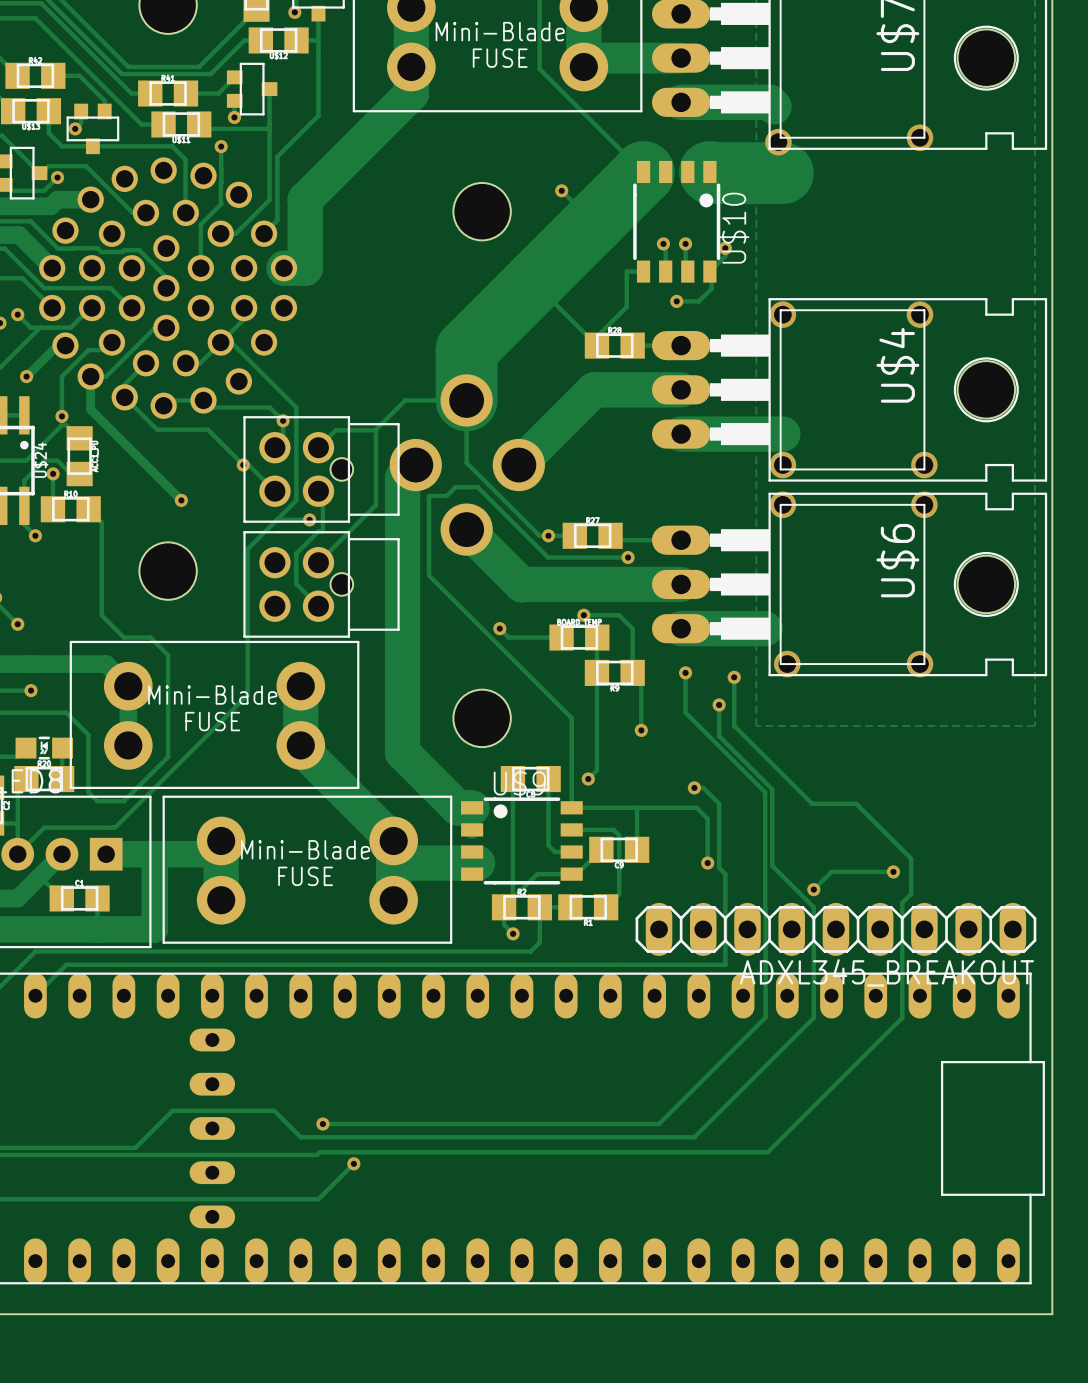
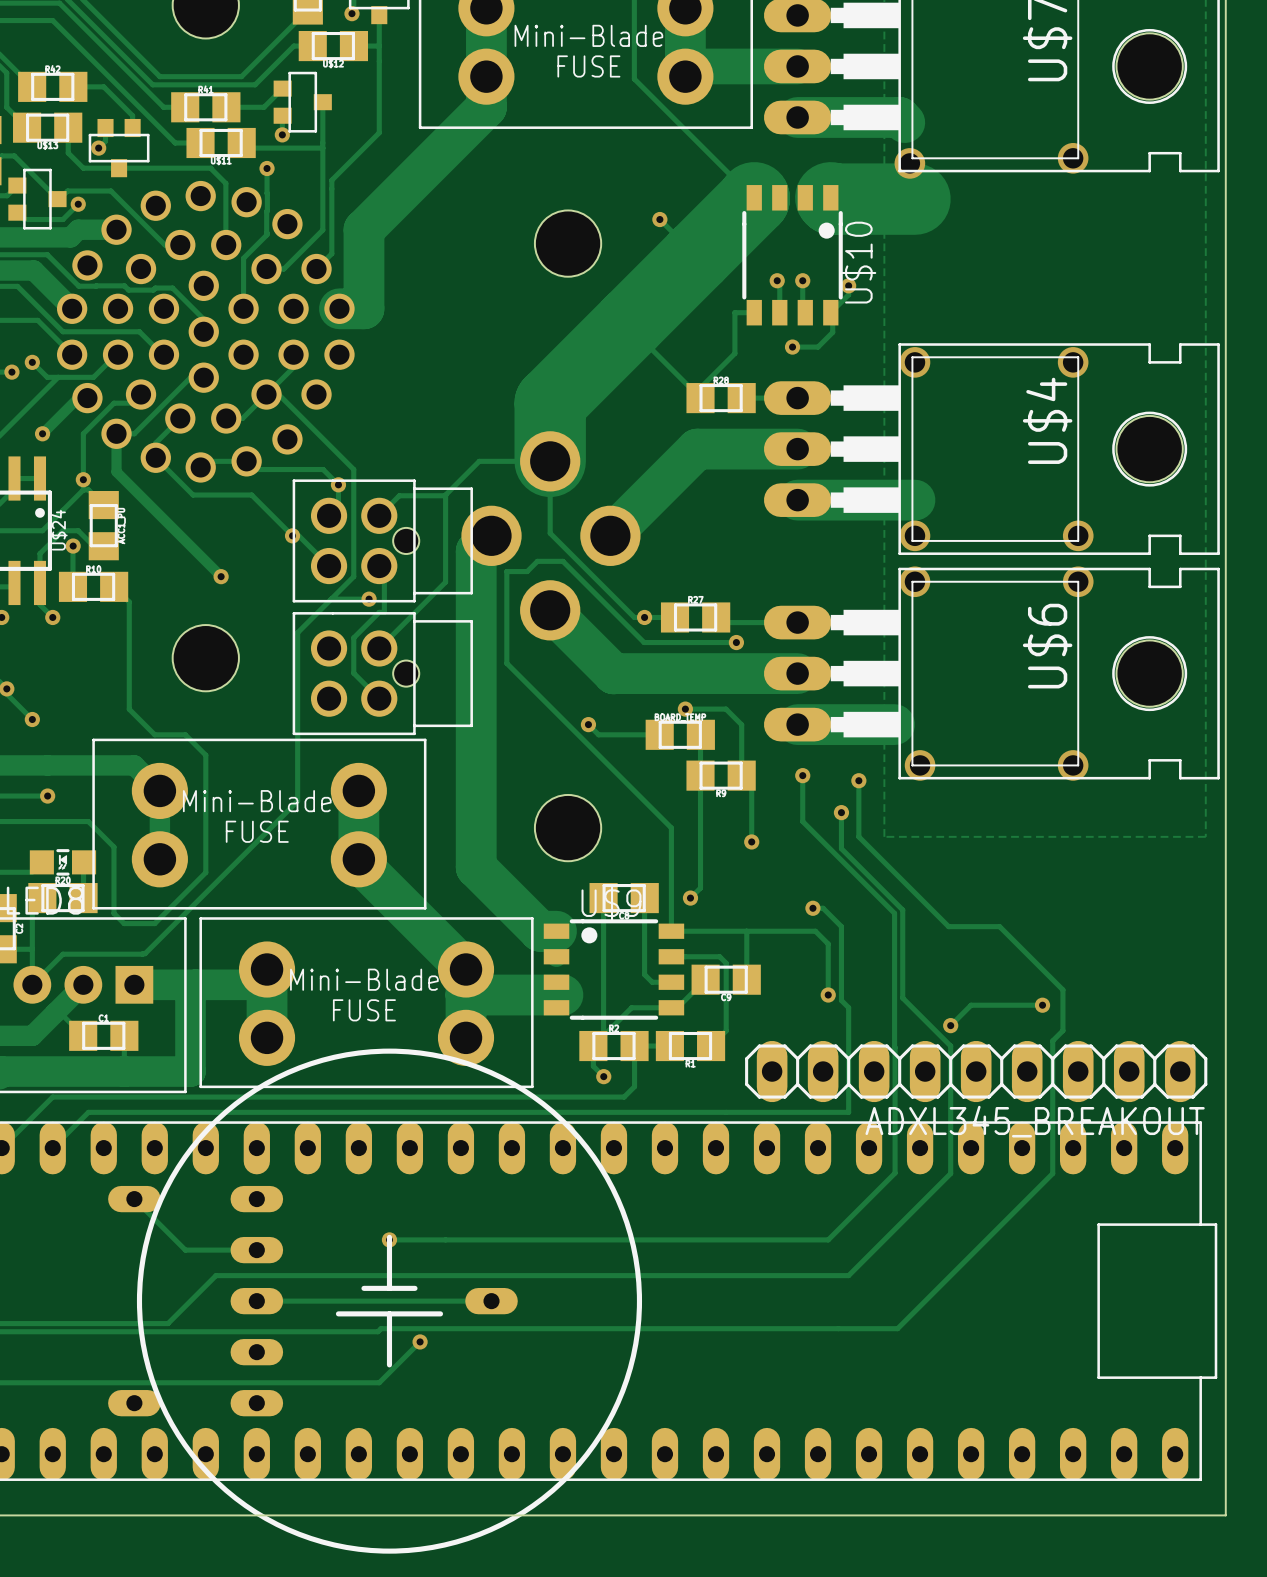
track: none -> (134, 1199) (185, 1250) (256, 1250)
track: (707, 1075) (659, 1124) (322, 1124) -> (828, 1239) (389, 1239)
track: (725, 1106) (694, 1137) (300, 1137) (274, 1110) (172, 1110) -> (848, 1275) (216, 1275) (210, 1280)
via position: (322, 1124) -> (389, 1239)
track: none -> (256, 1301) (491, 1301)
part: none -> (375, 1301)

